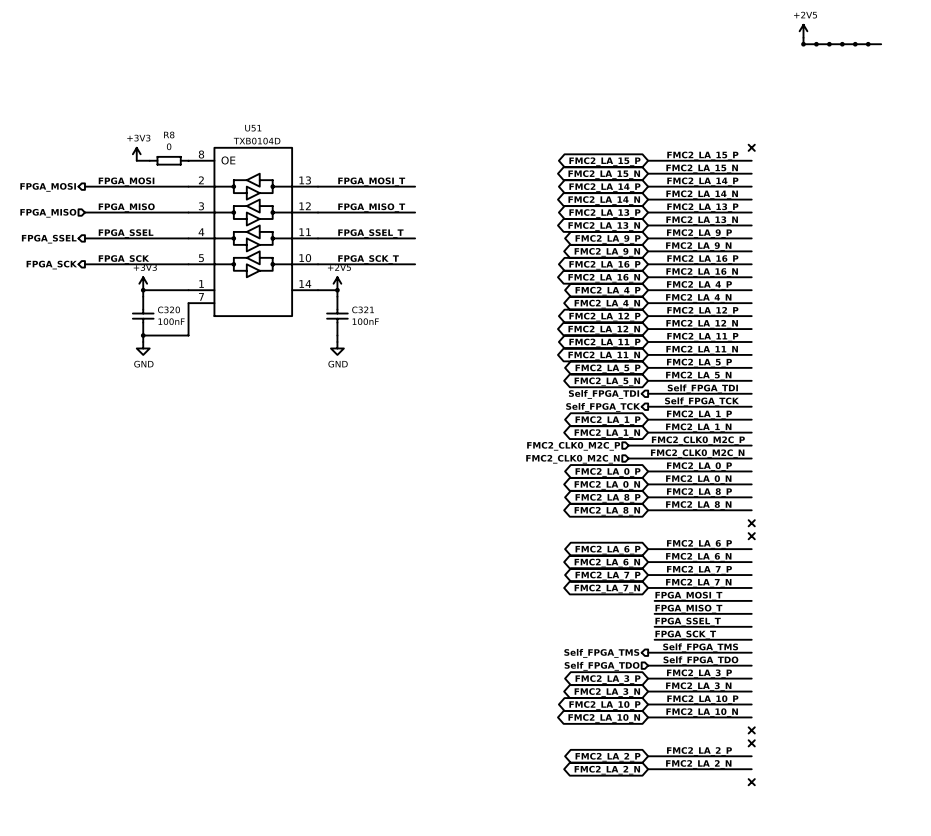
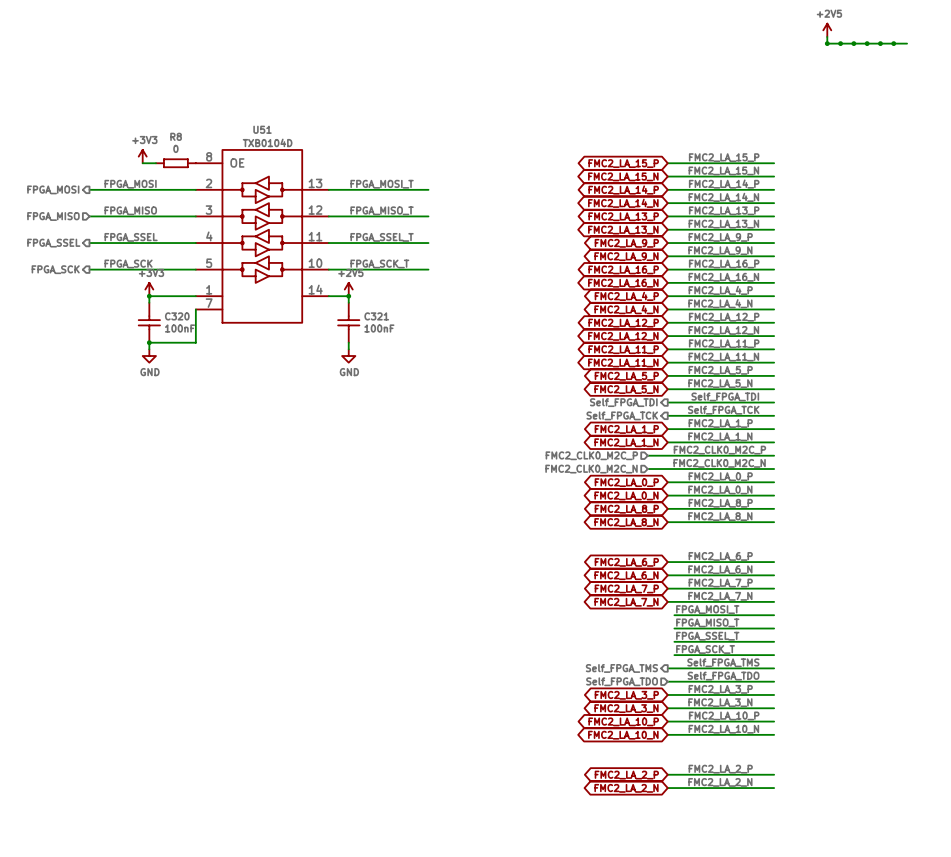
no-connect mark: (751, 147) -> none
no-connect mark: (751, 523) -> none
no-connect mark: (751, 536) -> none
no-connect mark: (751, 730) -> none
no-connect mark: (751, 743) -> none
no-connect mark: (751, 782) -> none

